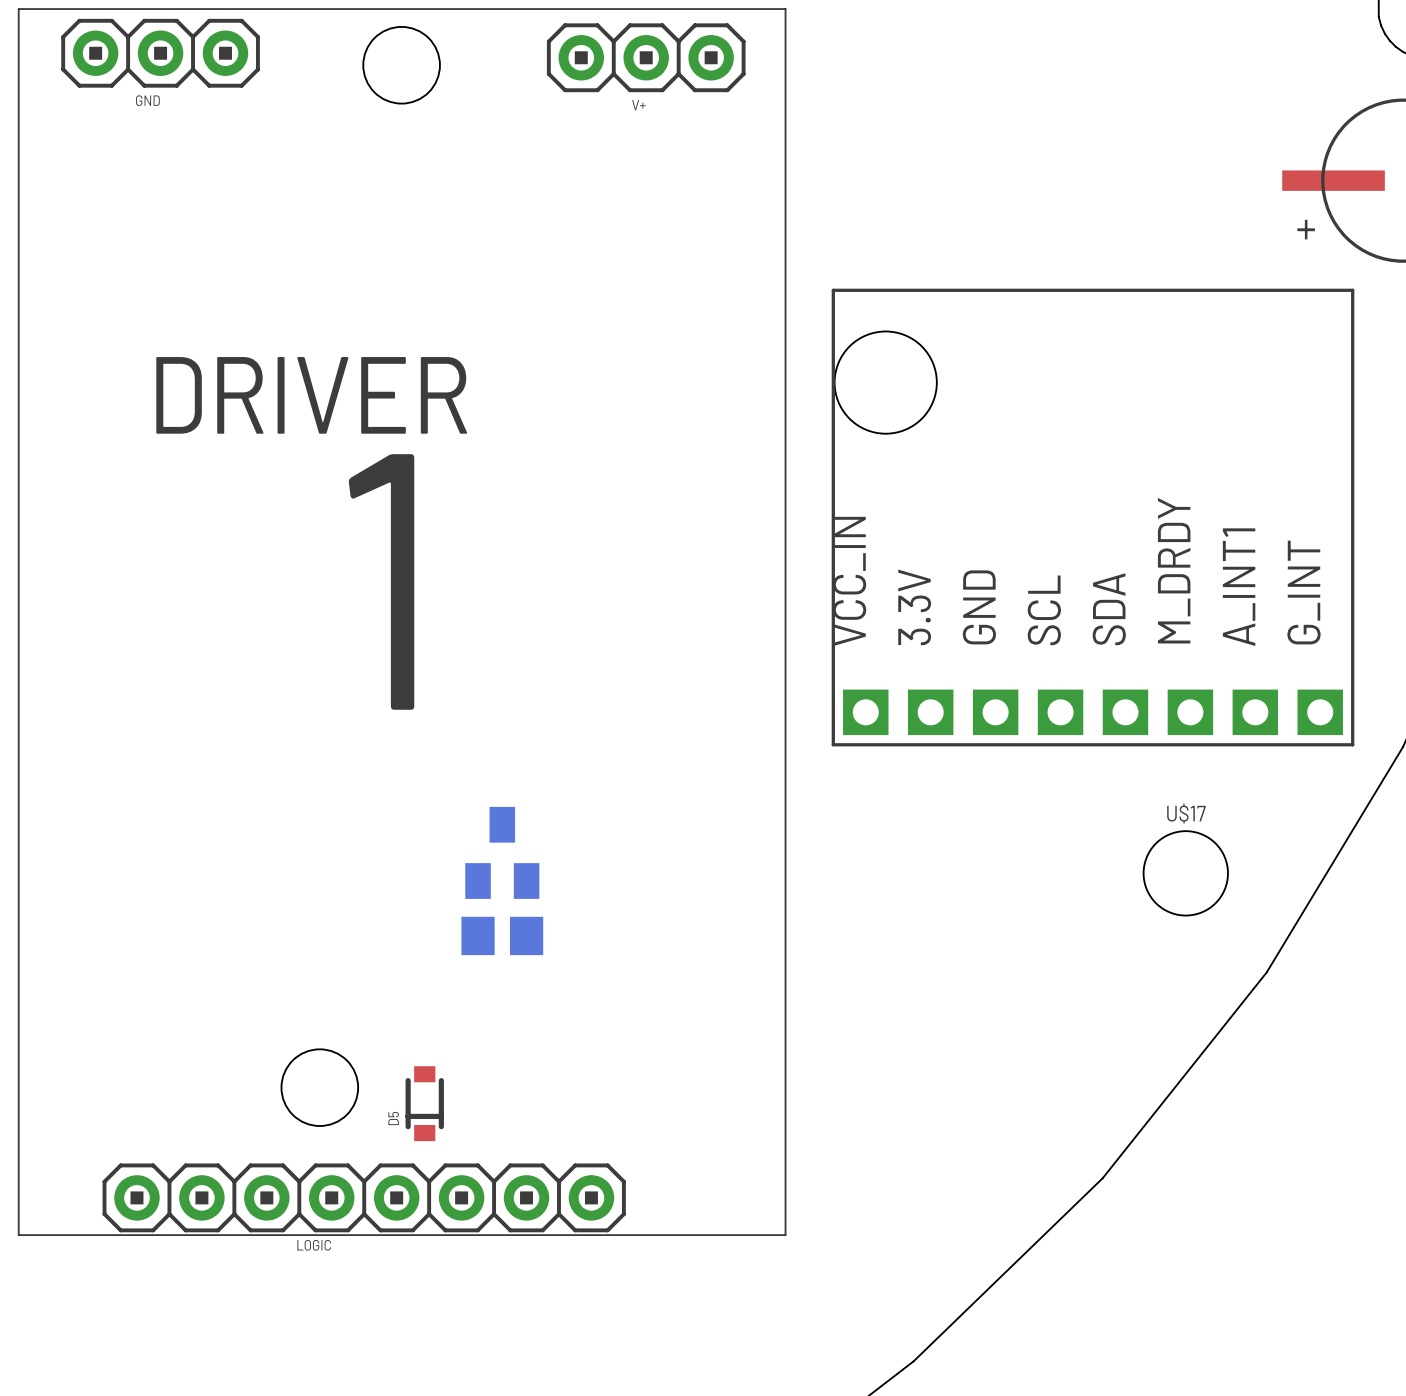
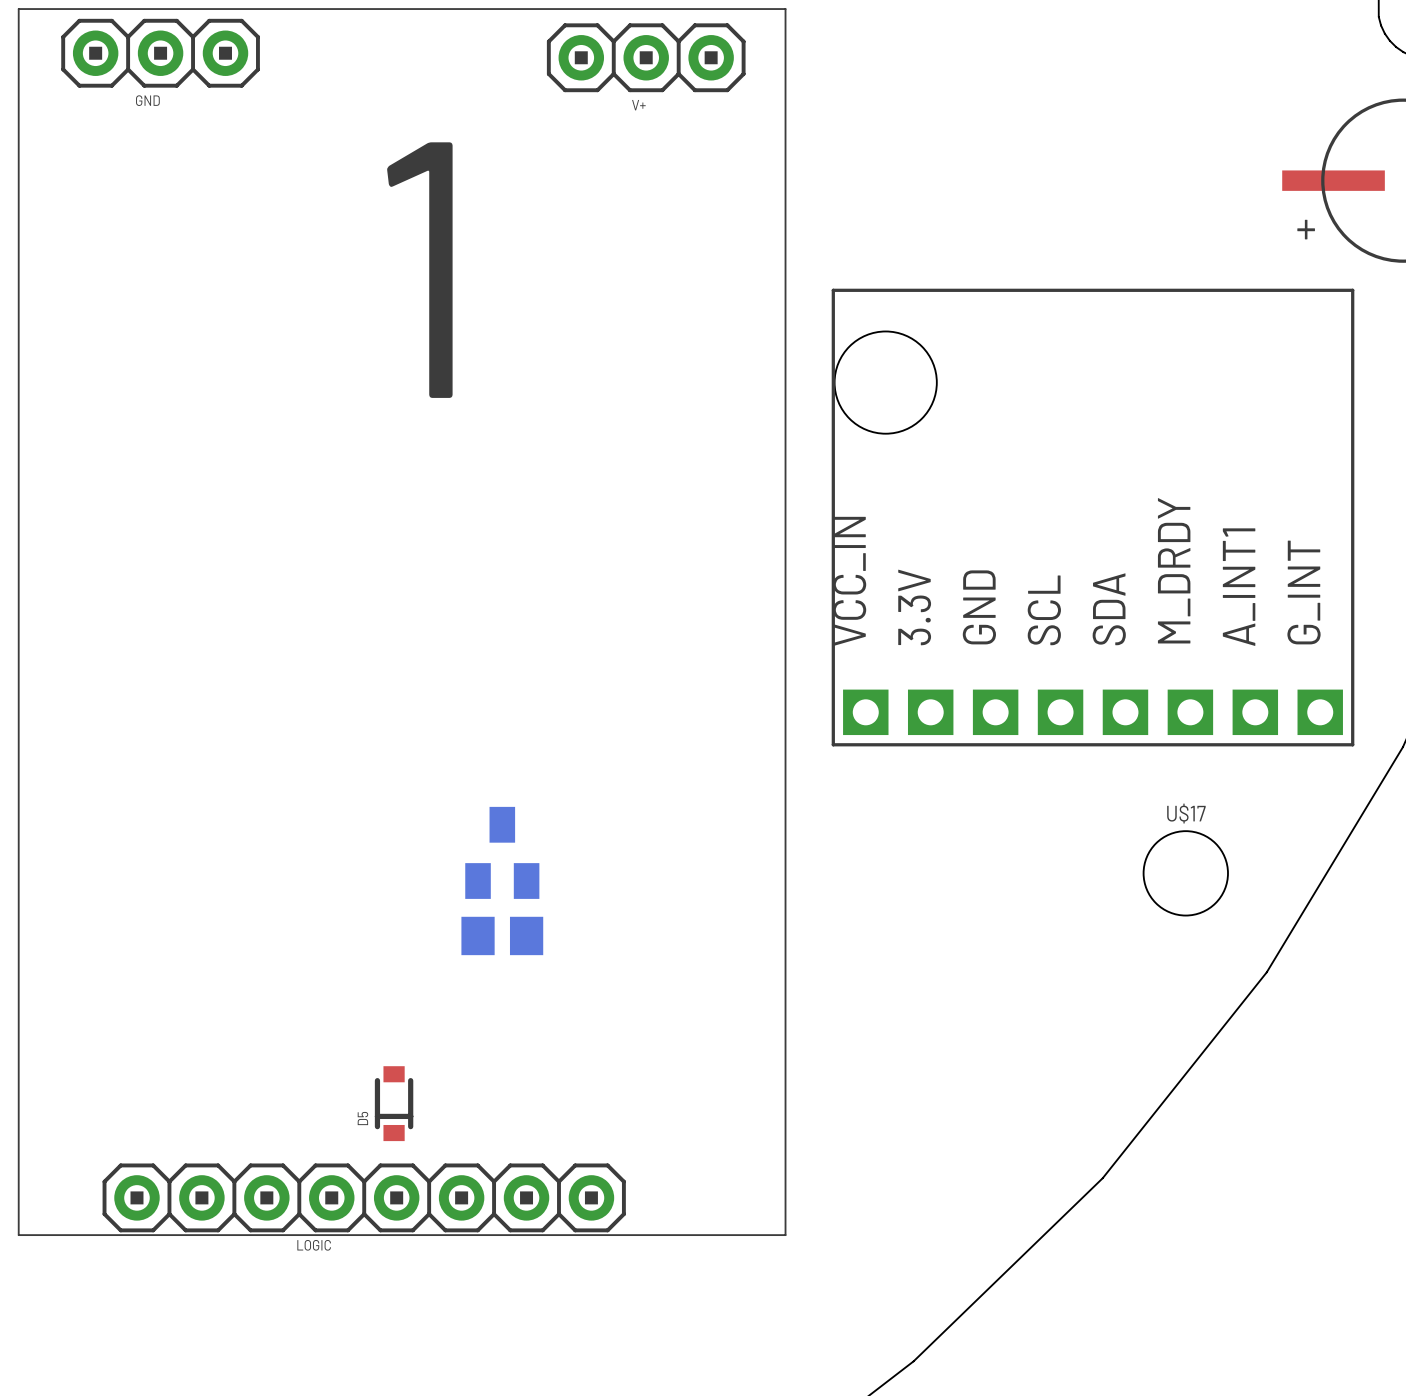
part footprint: [18, 9, 786, 1236] -> [18, 9, 786, 1236]
text: DRIVER (311, 395) -> none
text position: 1 (381, 581) -> 1 (419, 270)
D5 position: (424, 1103) -> (394, 1103)

